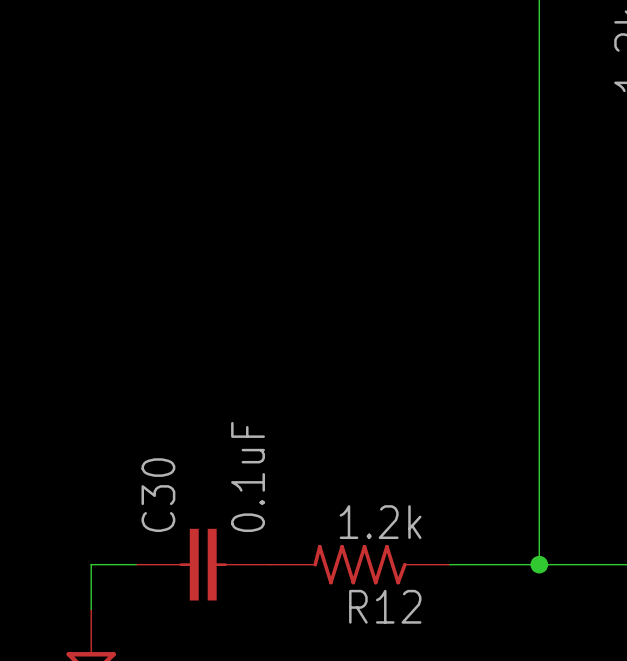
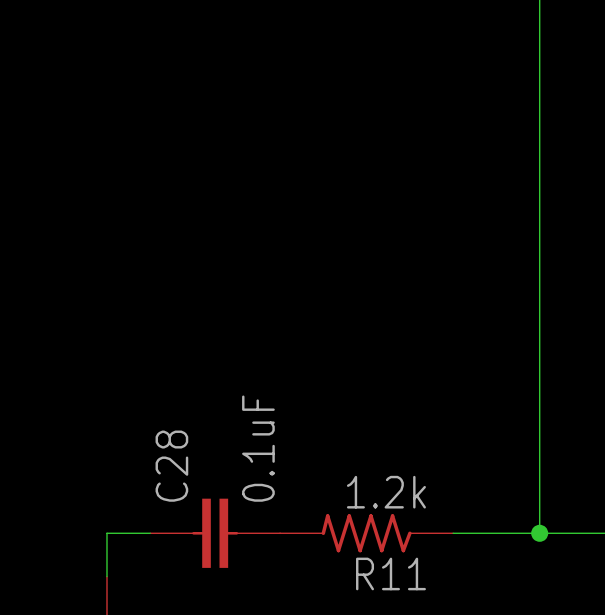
C30 name: C30 (158, 495) -> C28 (171, 466)
R12 name: R12 (385, 606) -> R11 (390, 573)

